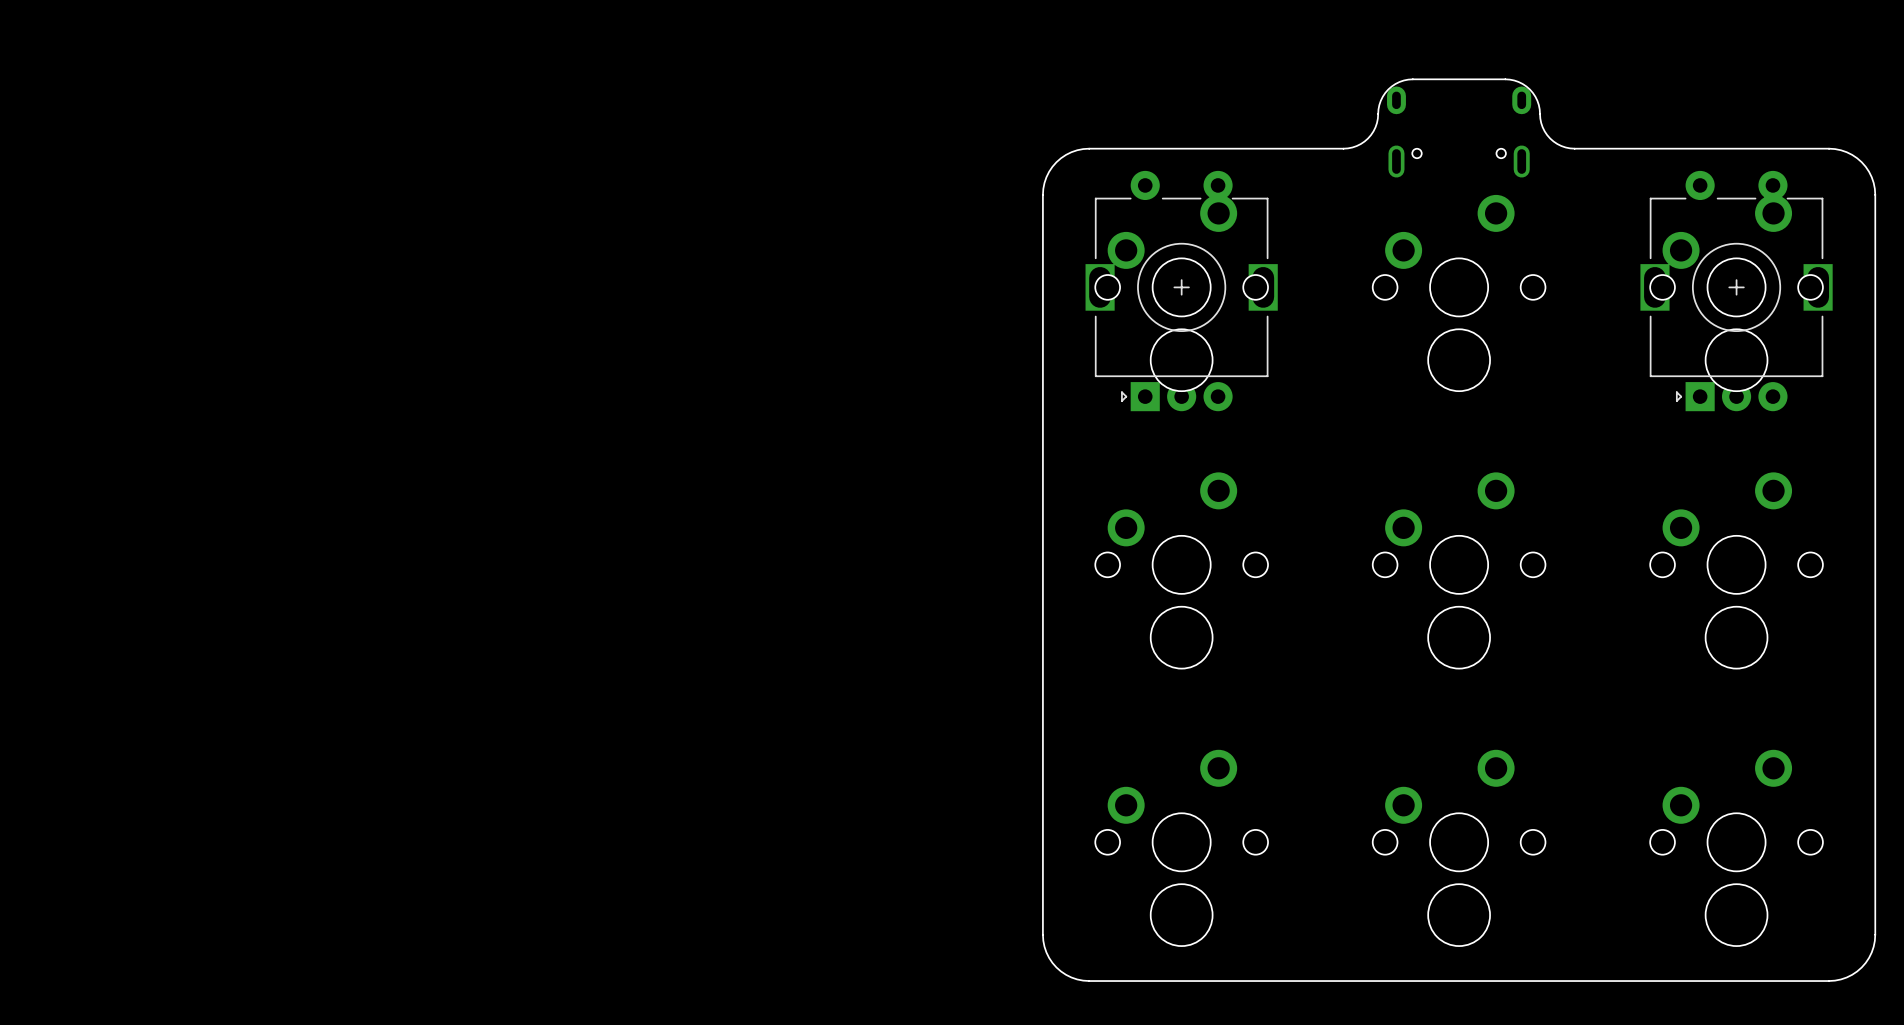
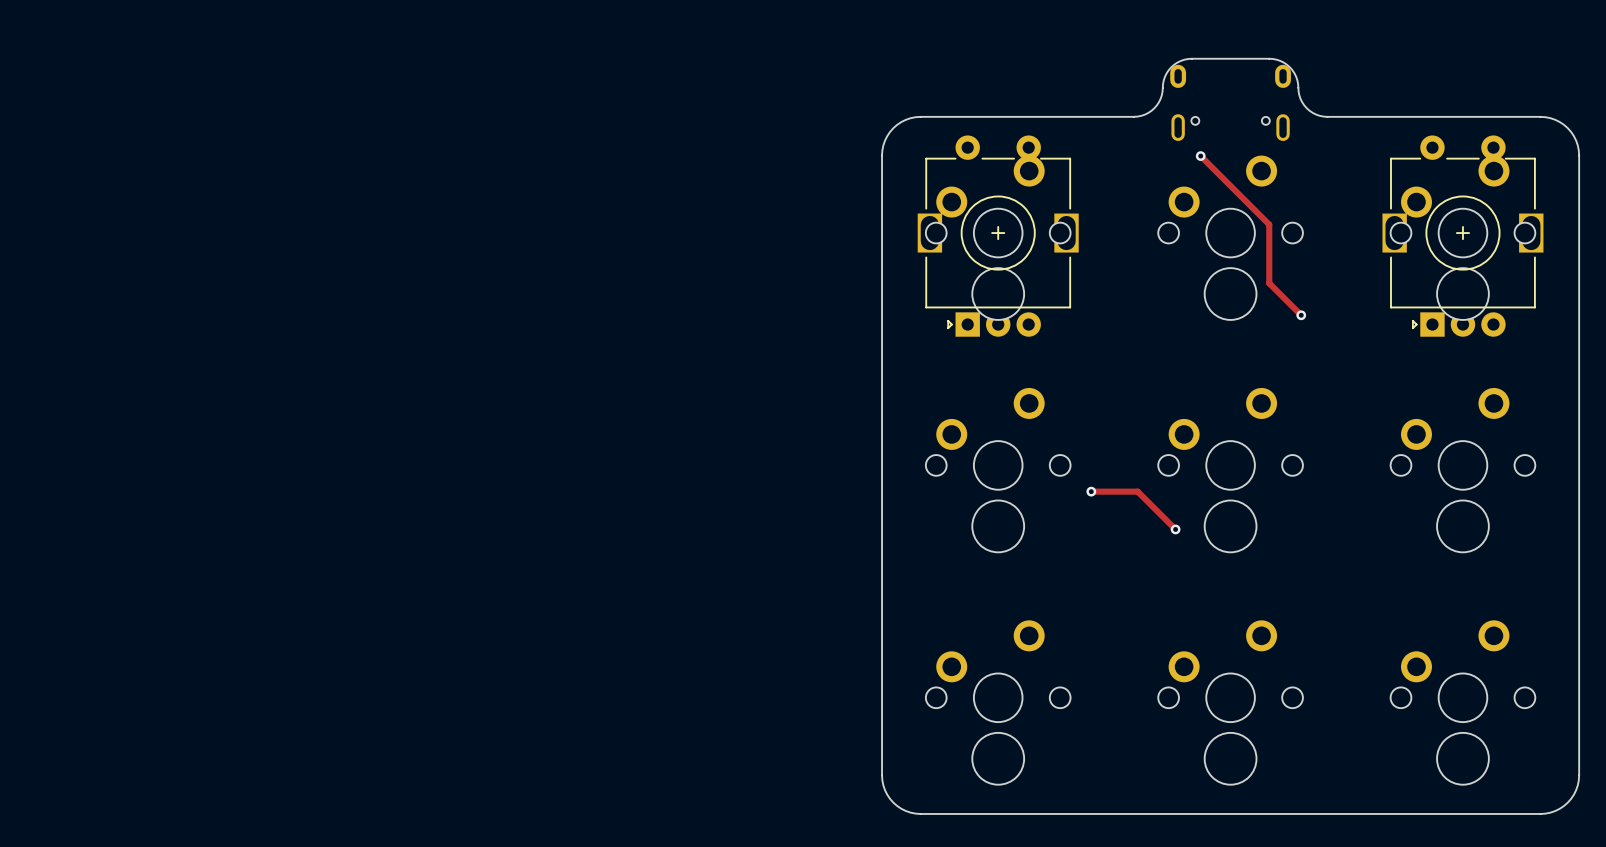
track: none -> (1200, 156) (1269, 224) (1269, 283) (1301, 315)
via: none -> (1200, 156)
via: none -> (1301, 315)
track: none -> (1091, 491) (1137, 491) (1175, 529)
via: none -> (1091, 491)
via: none -> (1175, 529)

